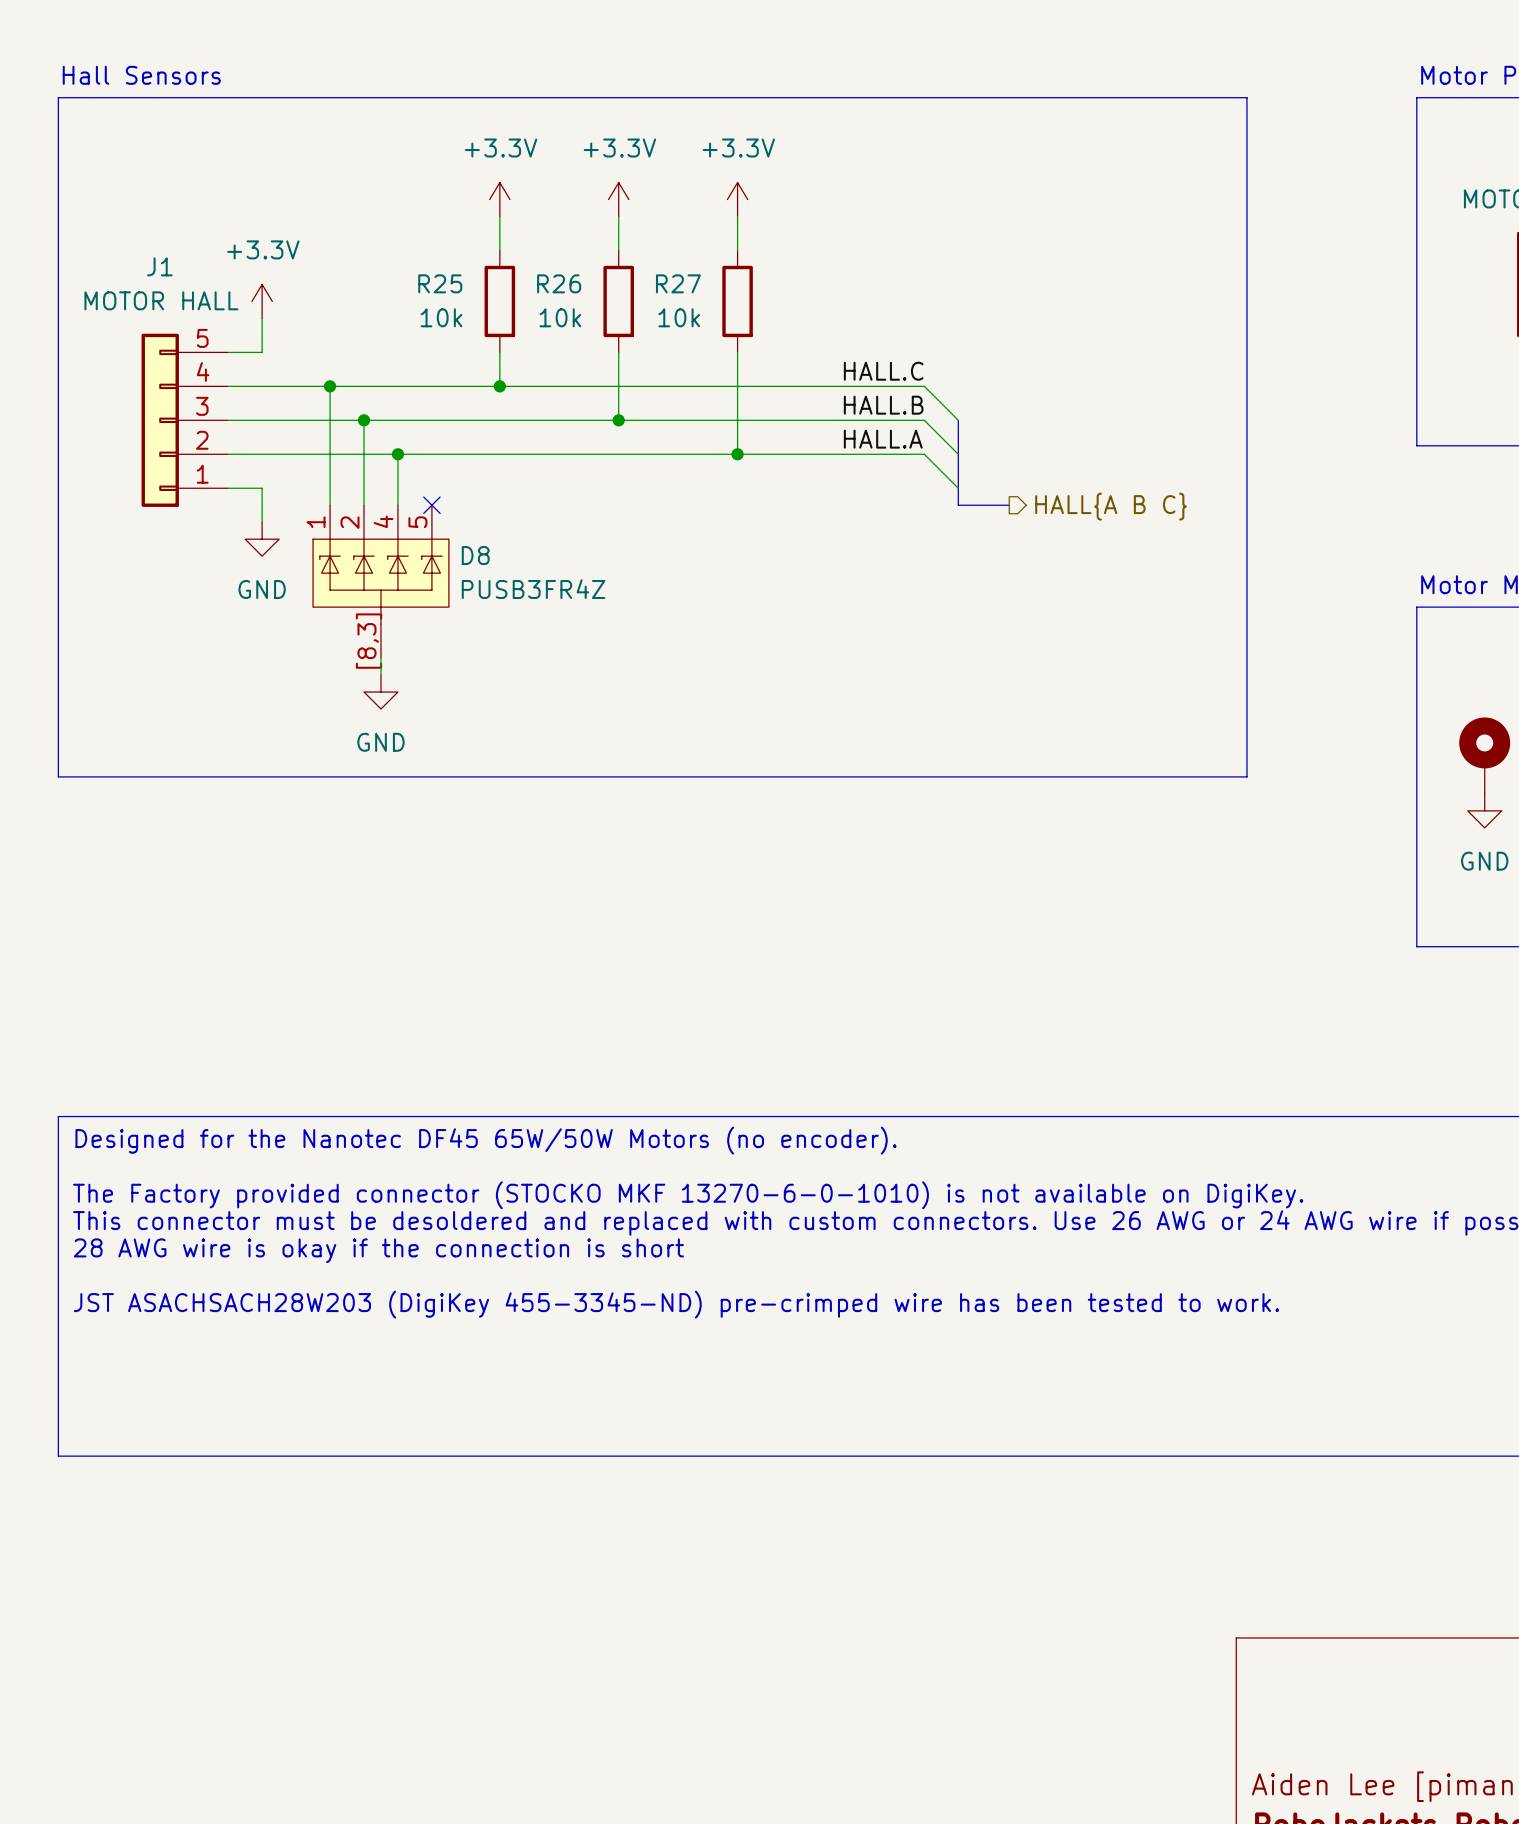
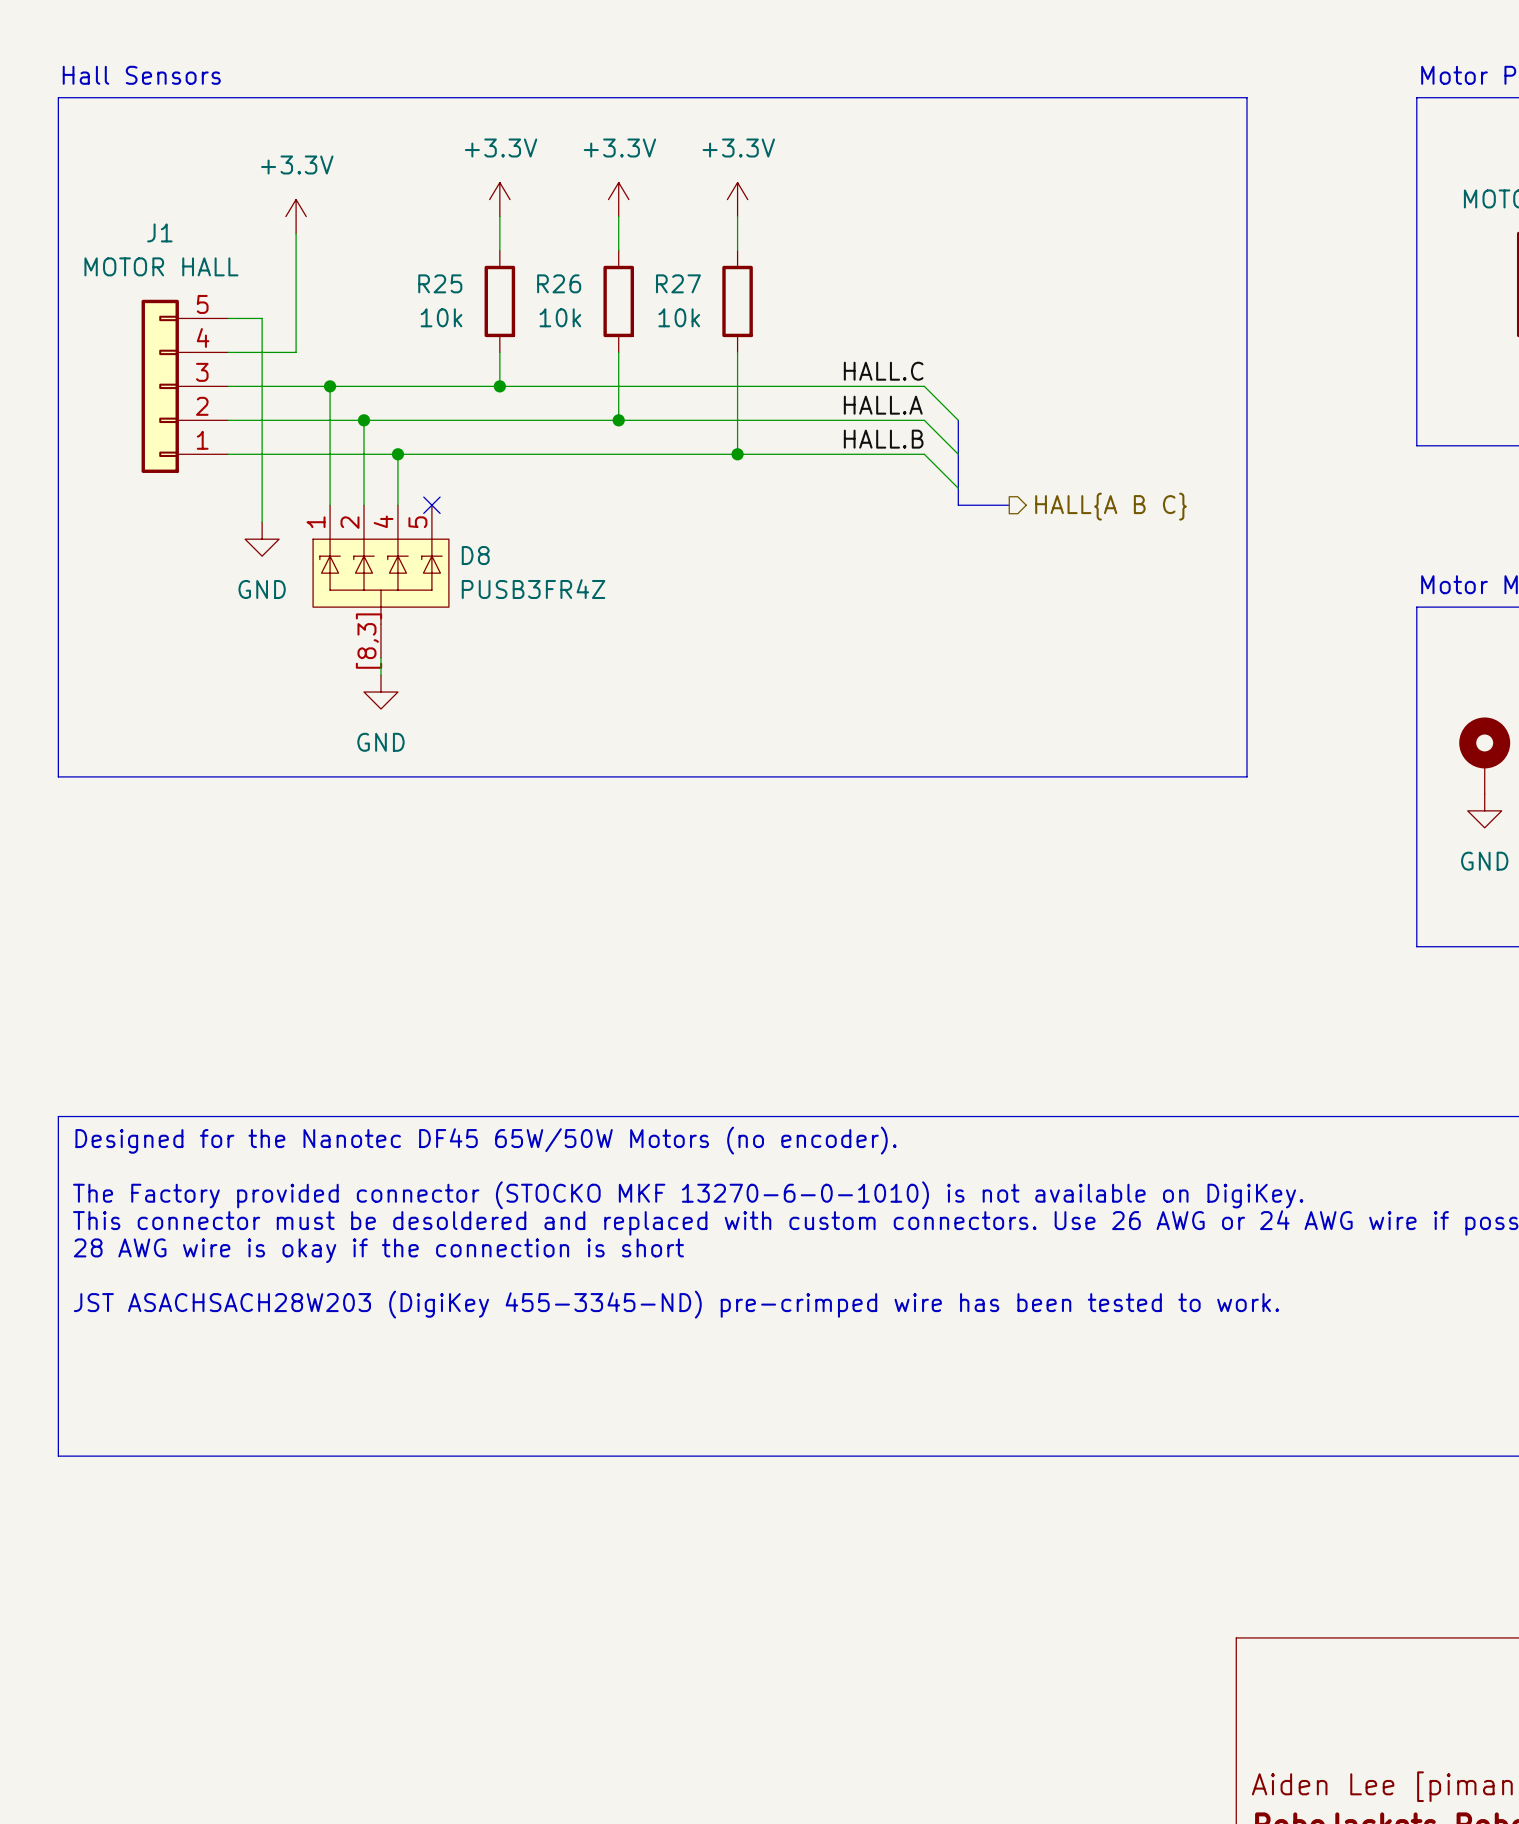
power symbol position: +3.3V (262, 301) -> +3.3V (296, 216)
wire: none -> (228, 318) (262, 318)
label: HALL.B (883, 405) -> HALL.A (883, 405)
J1 position: (184, 420) -> (184, 386)
label: HALL.A (883, 439) -> HALL.B (883, 439)
wire: (228, 488) (262, 488) -> (296, 233) (296, 352) (262, 352) (262, 488)

